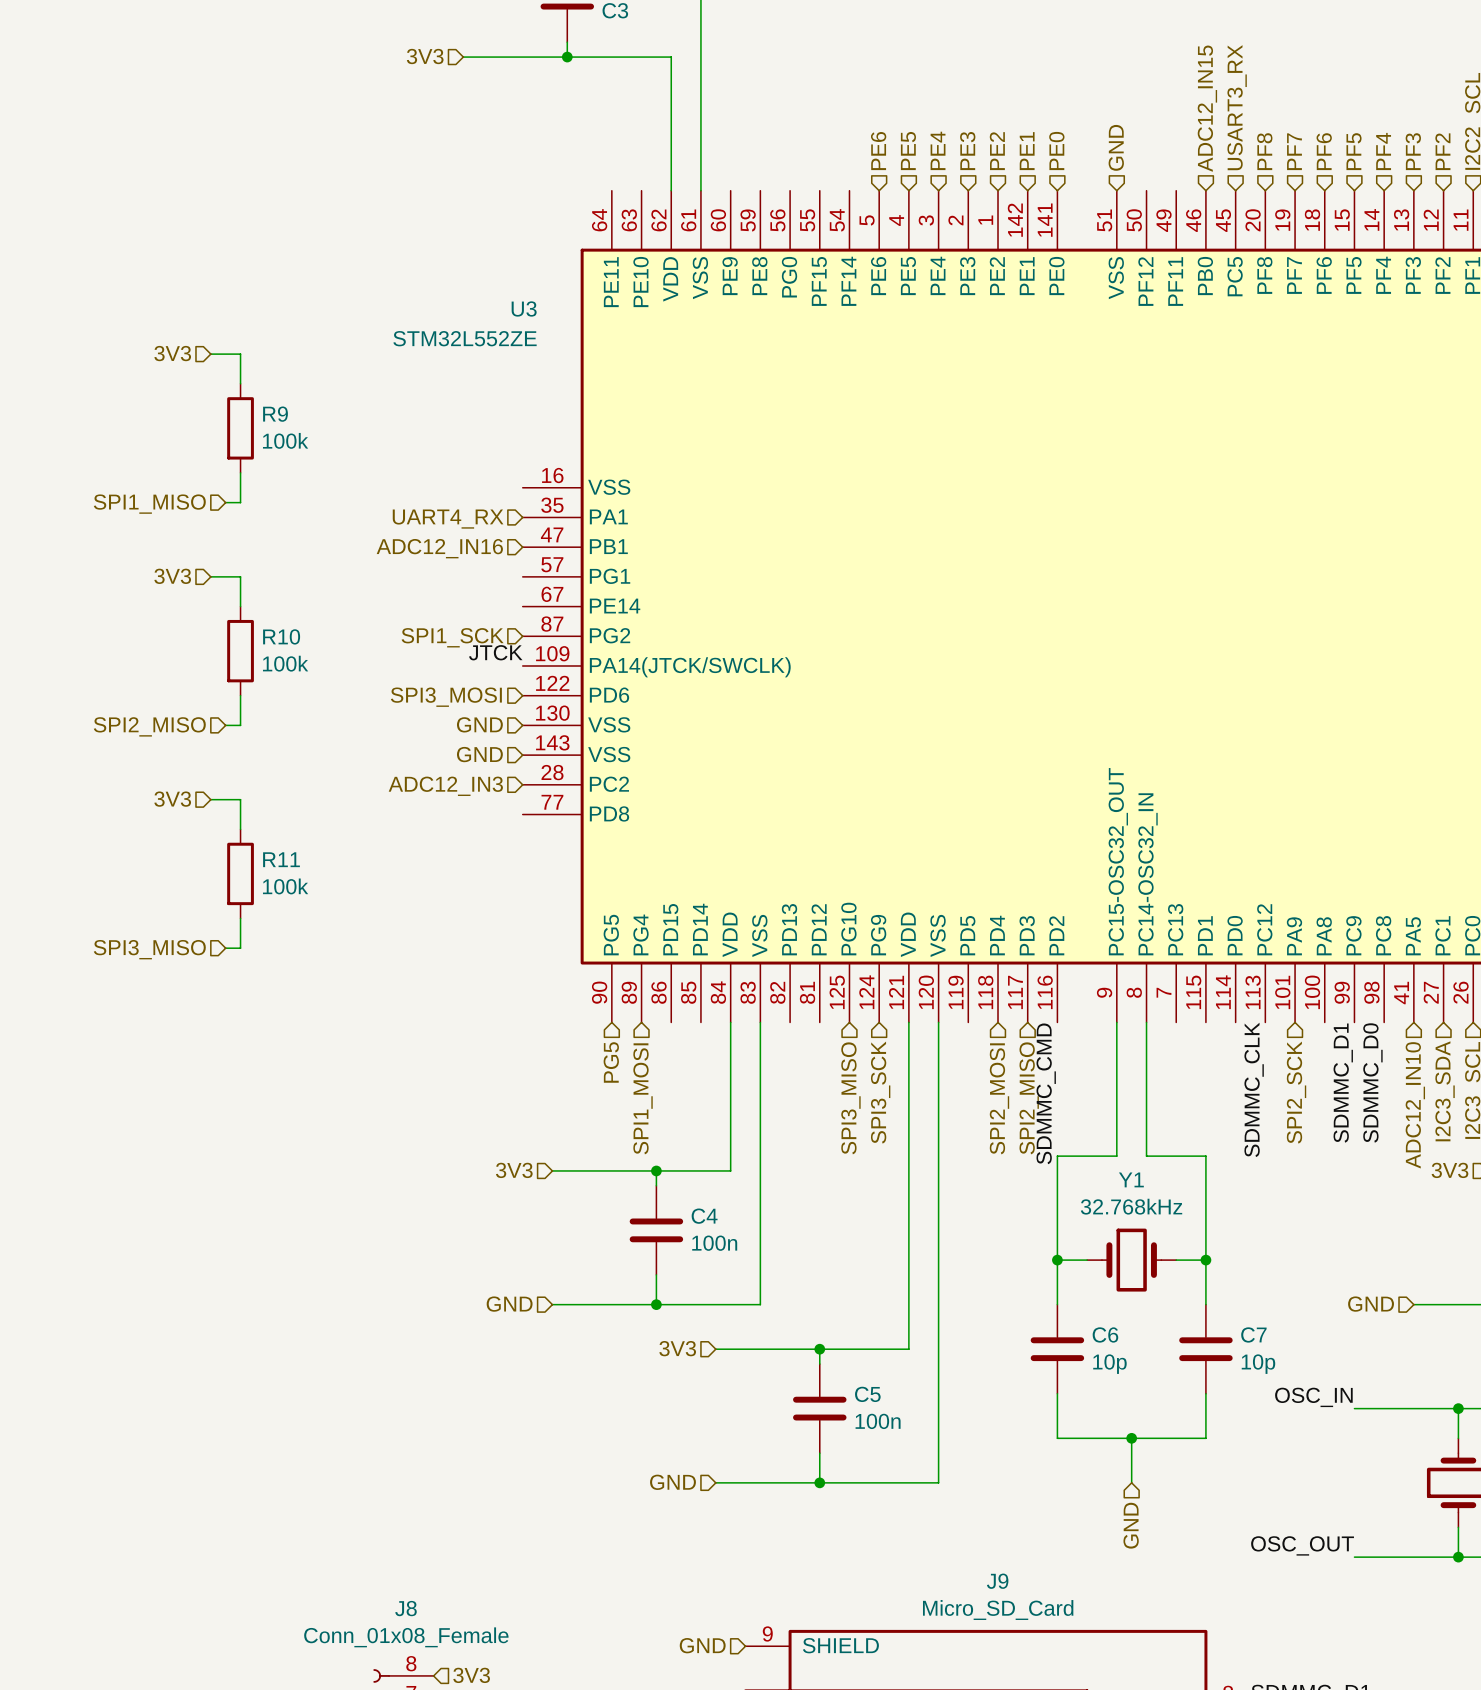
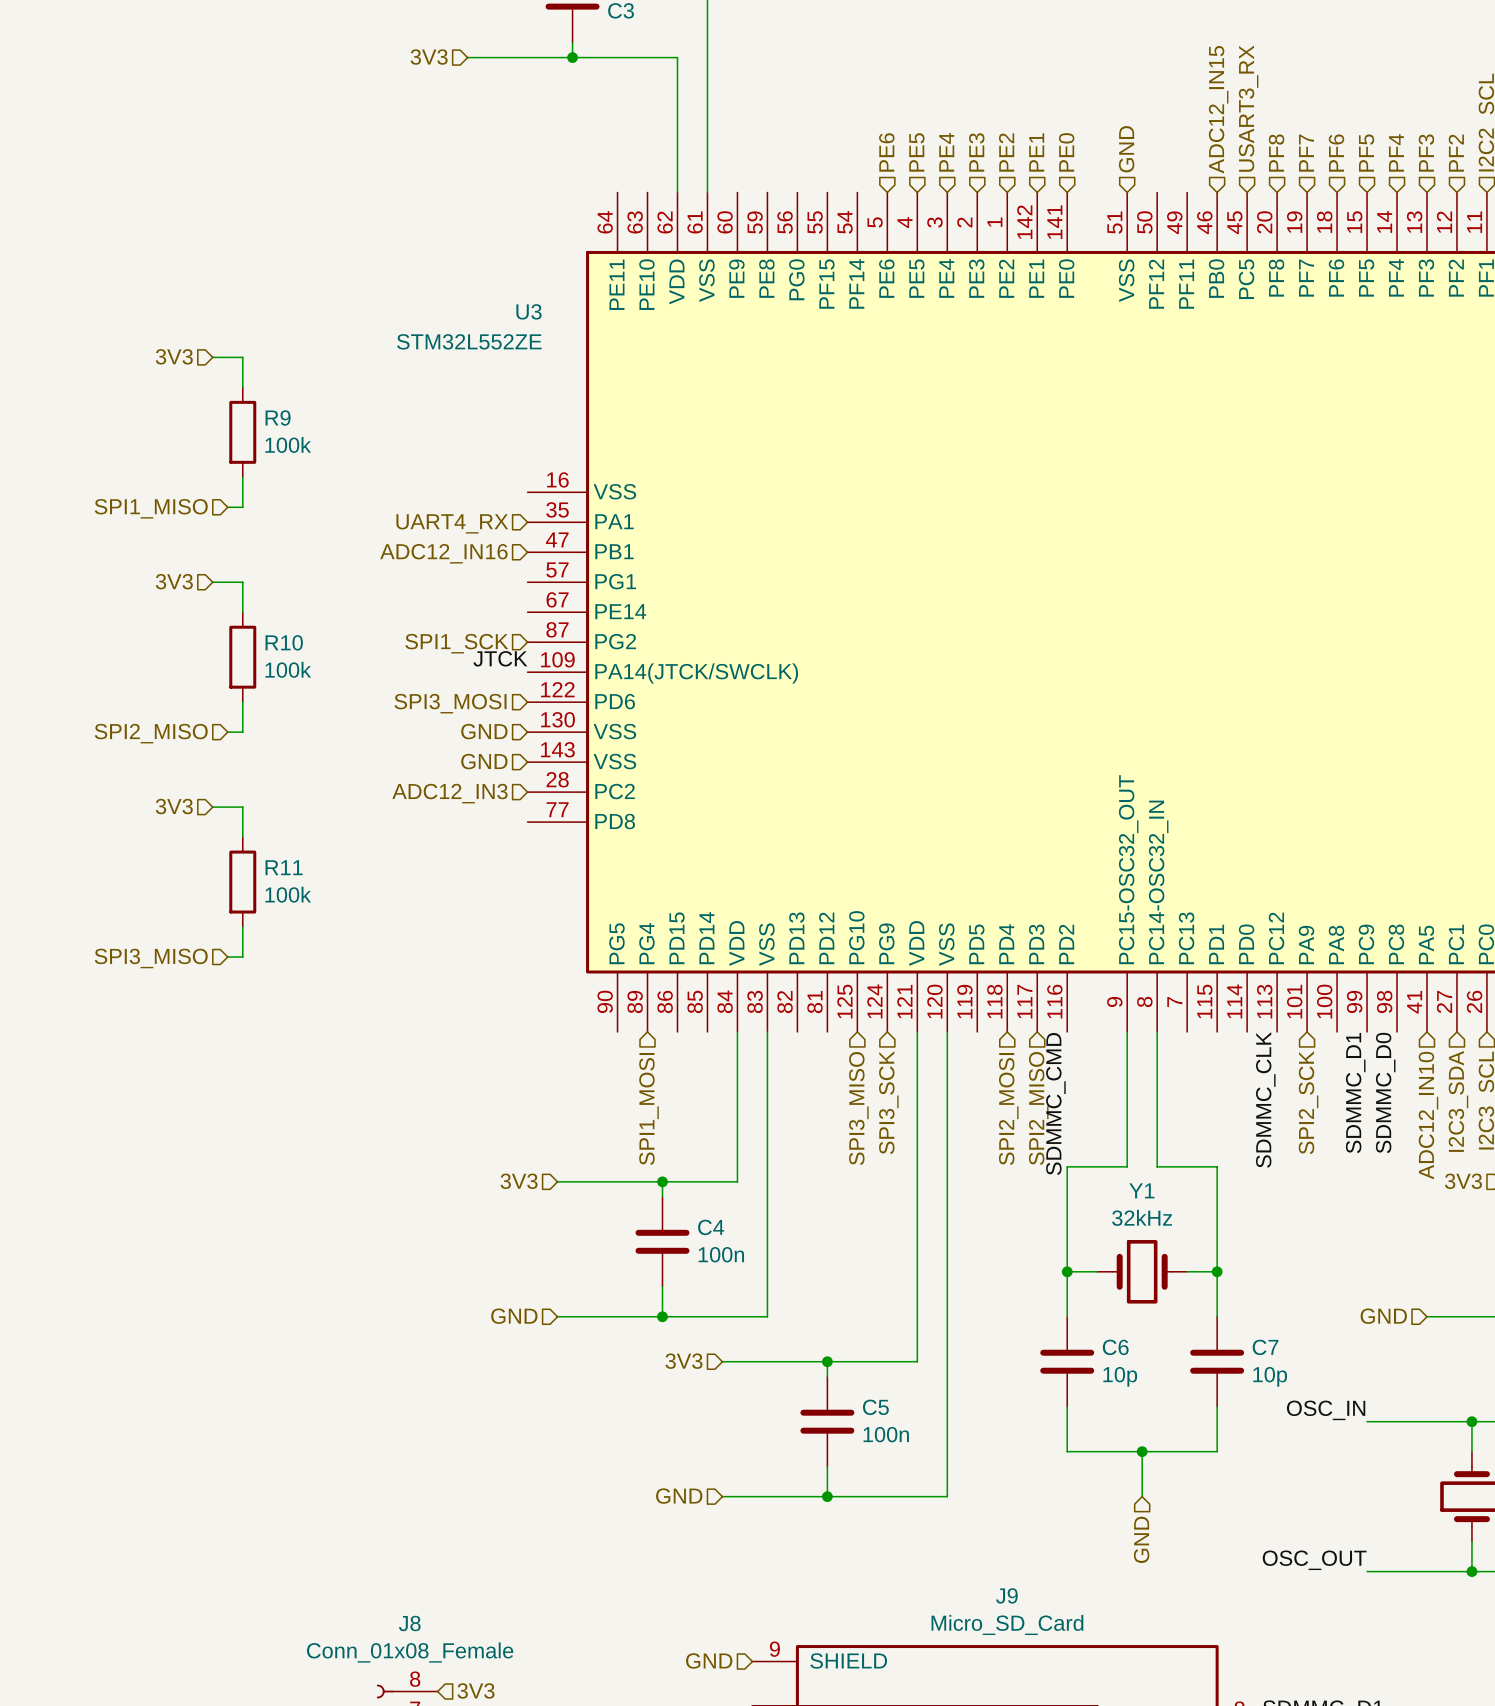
hierarchical label: PG5 (611, 1062) -> none
Y1 value: 32.768kHz (1131, 1206) -> 32kHz (1142, 1217)

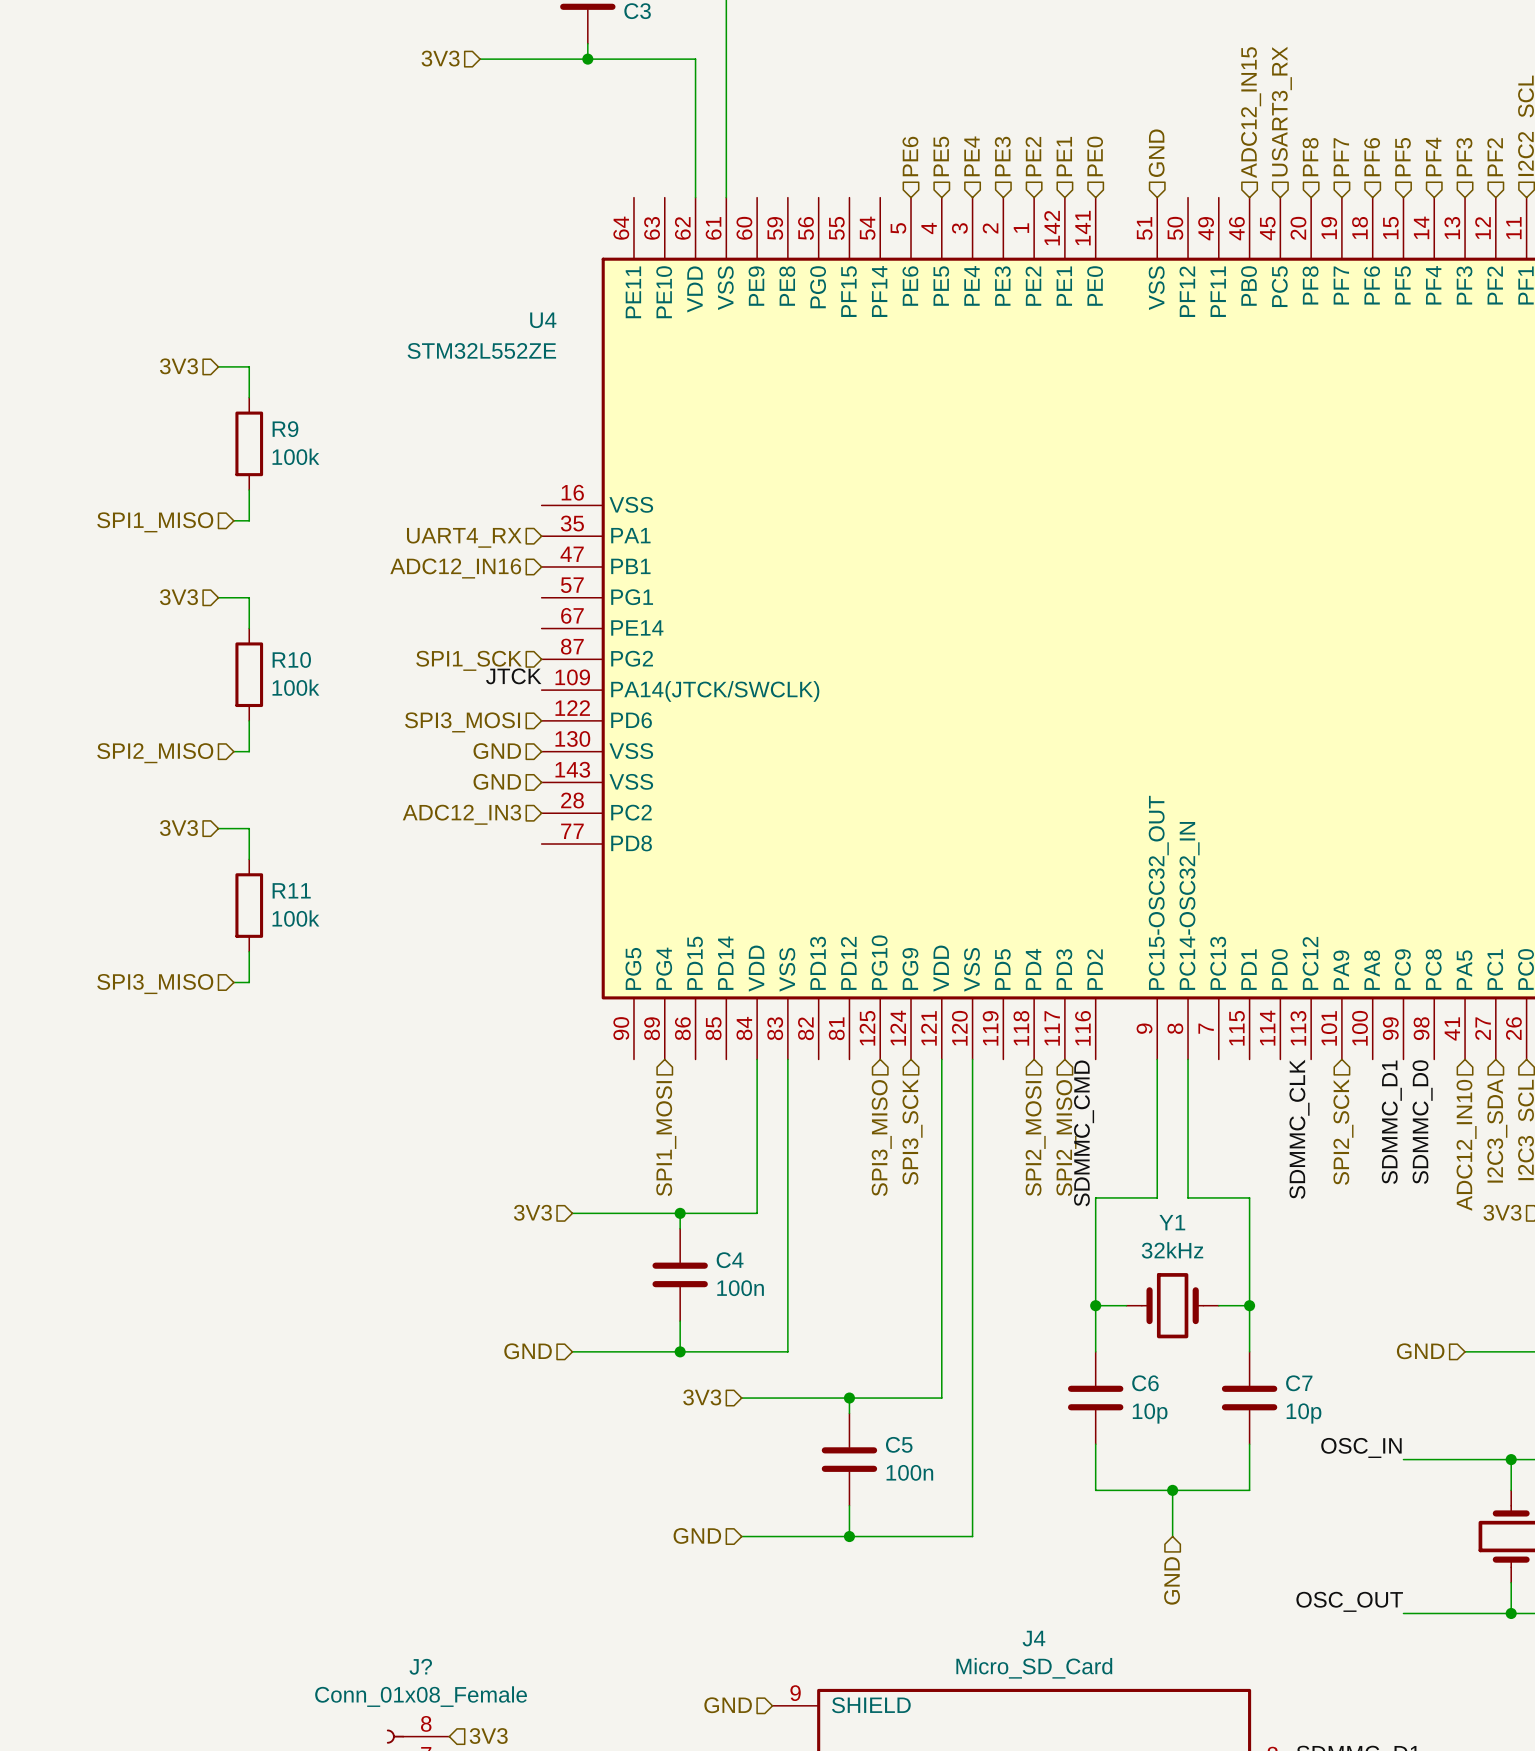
U3 name: U3 (529, 311) -> U4 (543, 320)
J9 name: J9 (1006, 1595) -> J4 (1033, 1638)
J8 name: J8 (409, 1623) -> J? (420, 1666)

